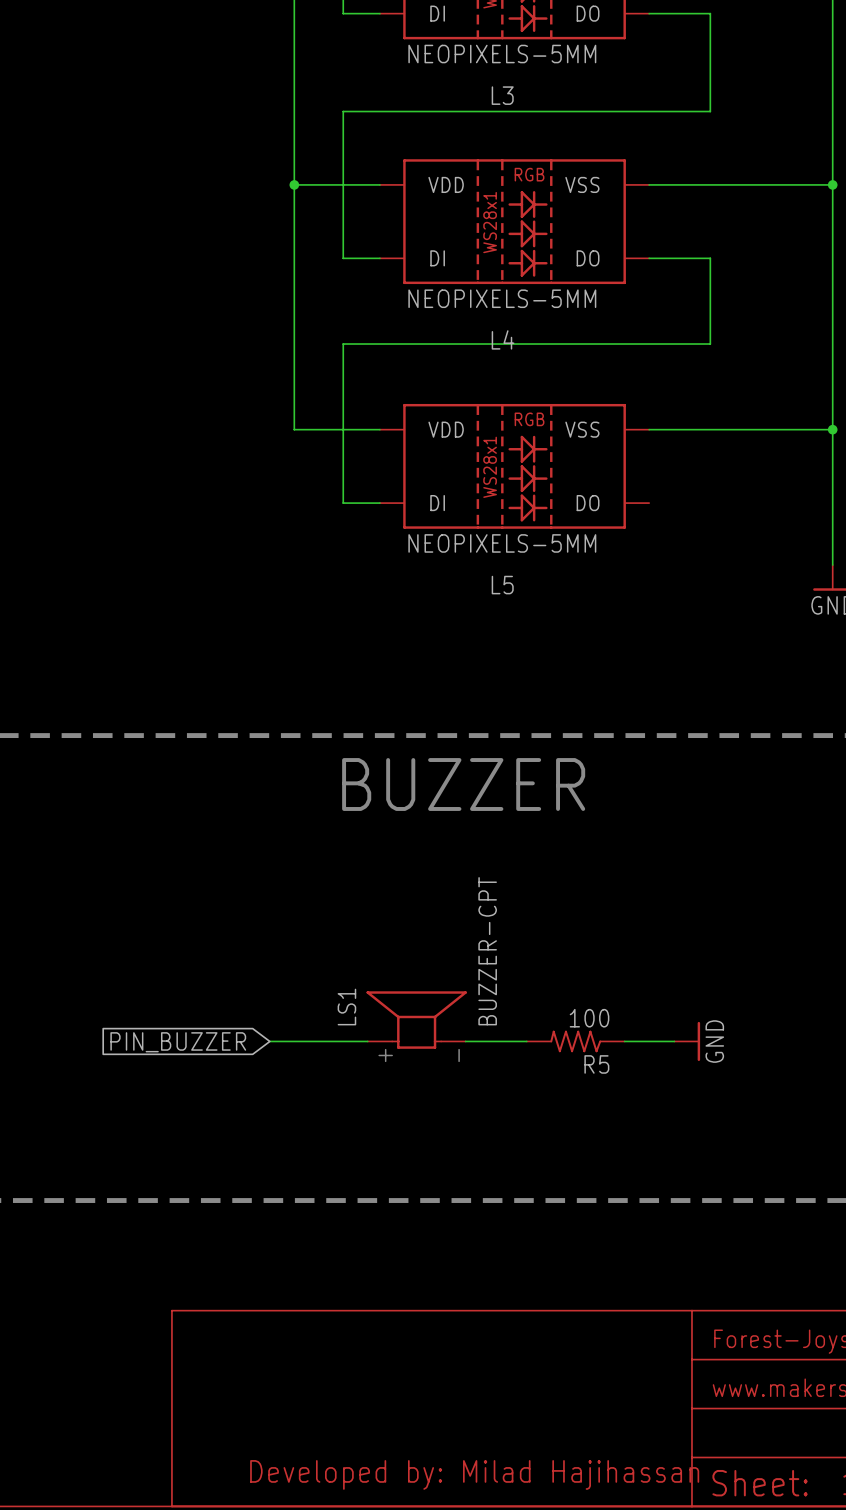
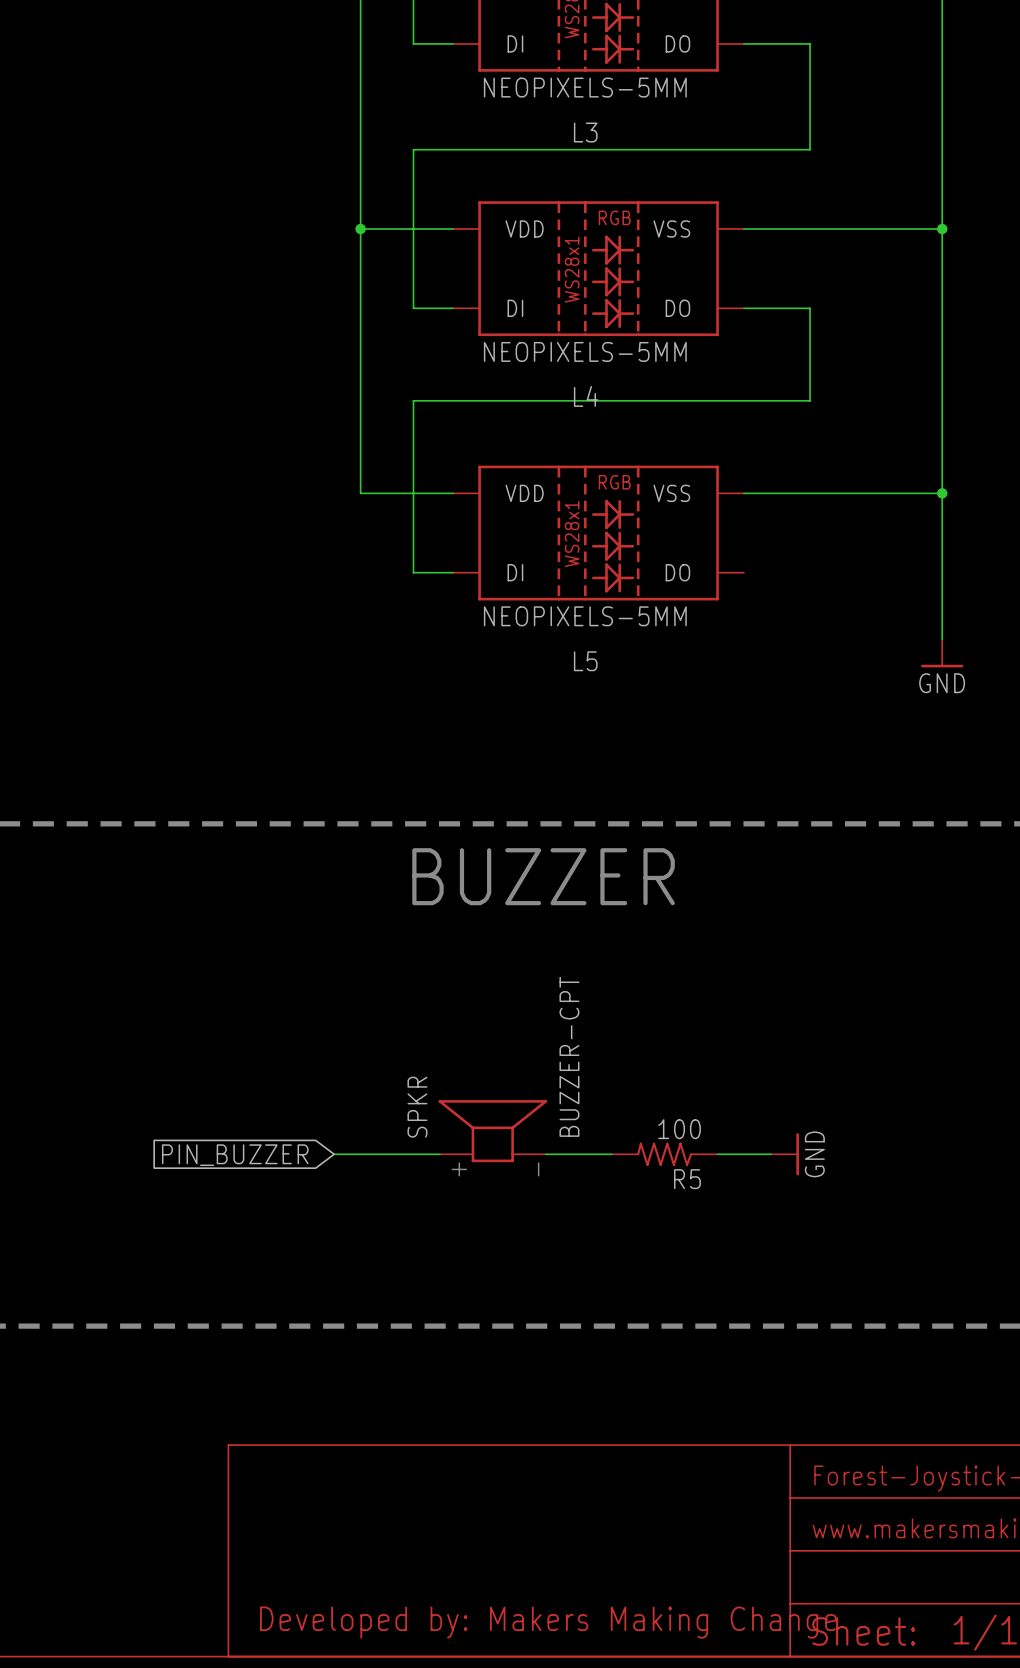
LS1 name: LS1 (346, 1007) -> SPKR (417, 1107)
text: Developed by: Milad Hajihassan (474, 1474) -> Developed by: Makers Making Change (548, 1622)

